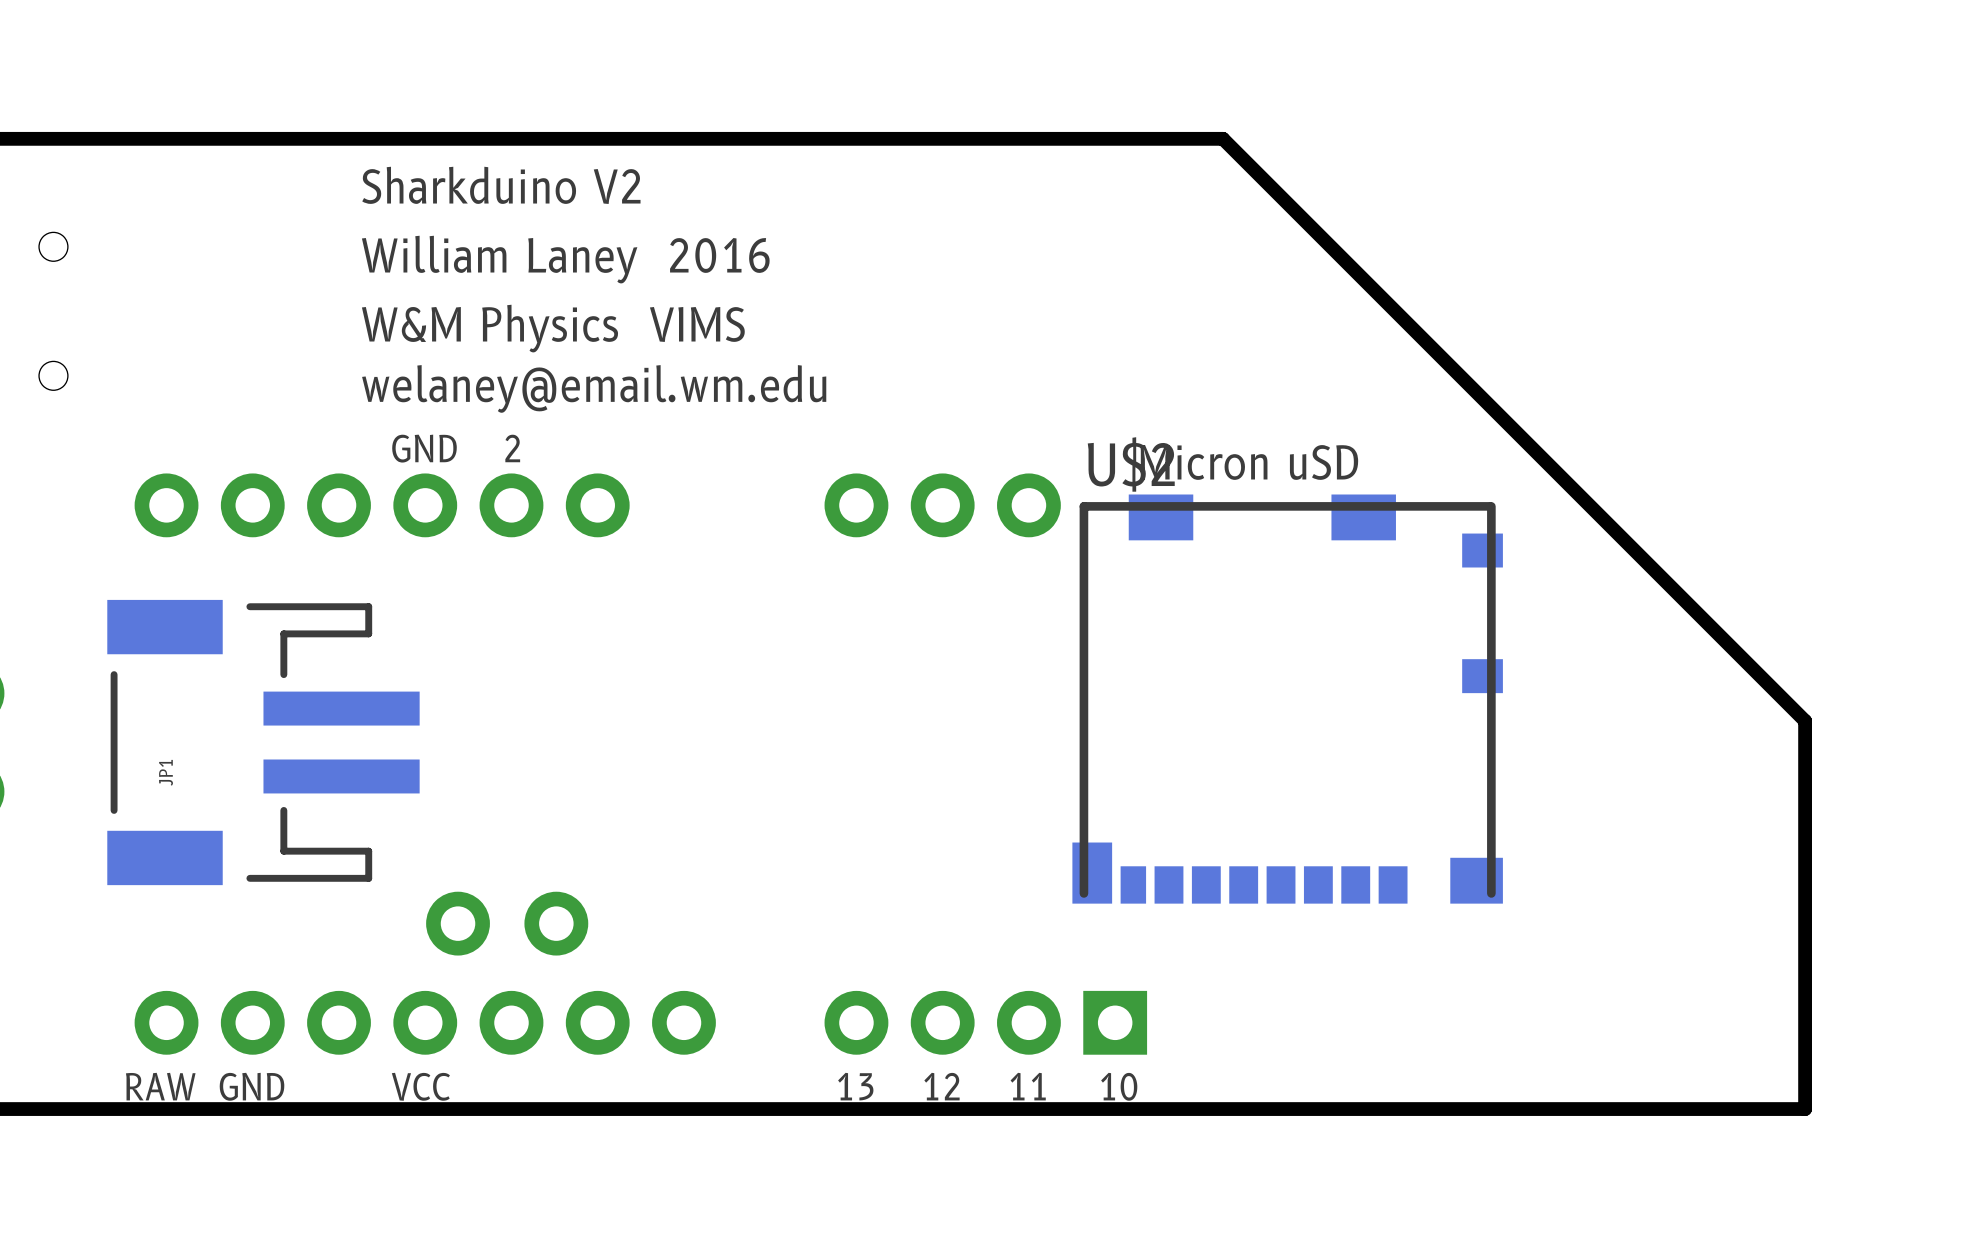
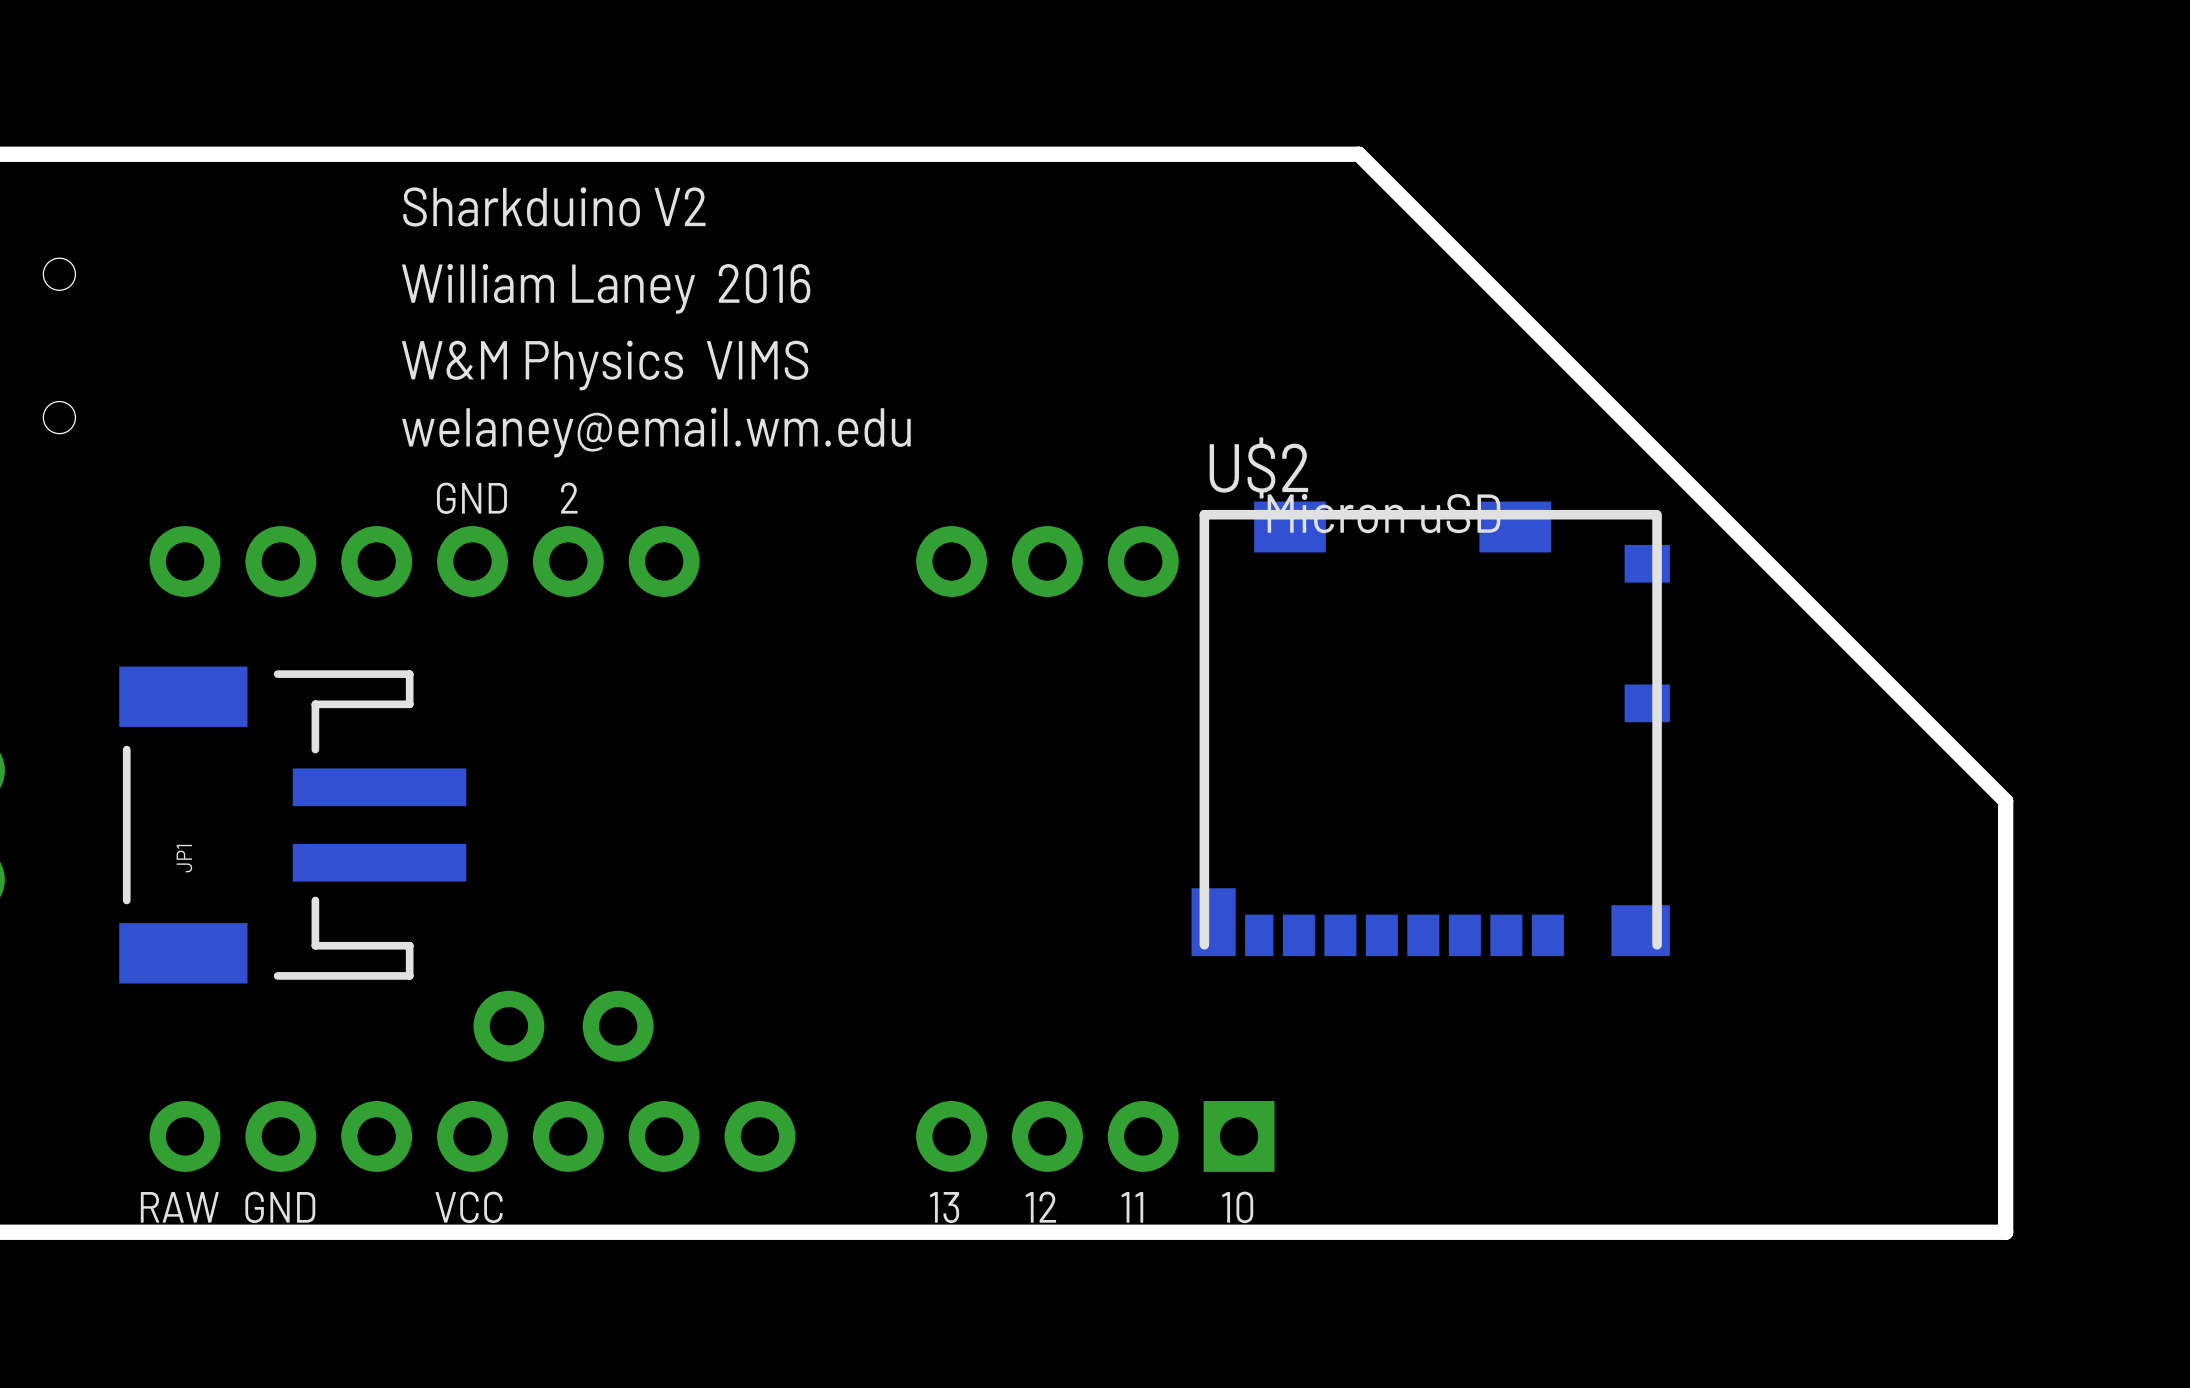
U$2 position: (1287, 699) -> (1430, 728)

